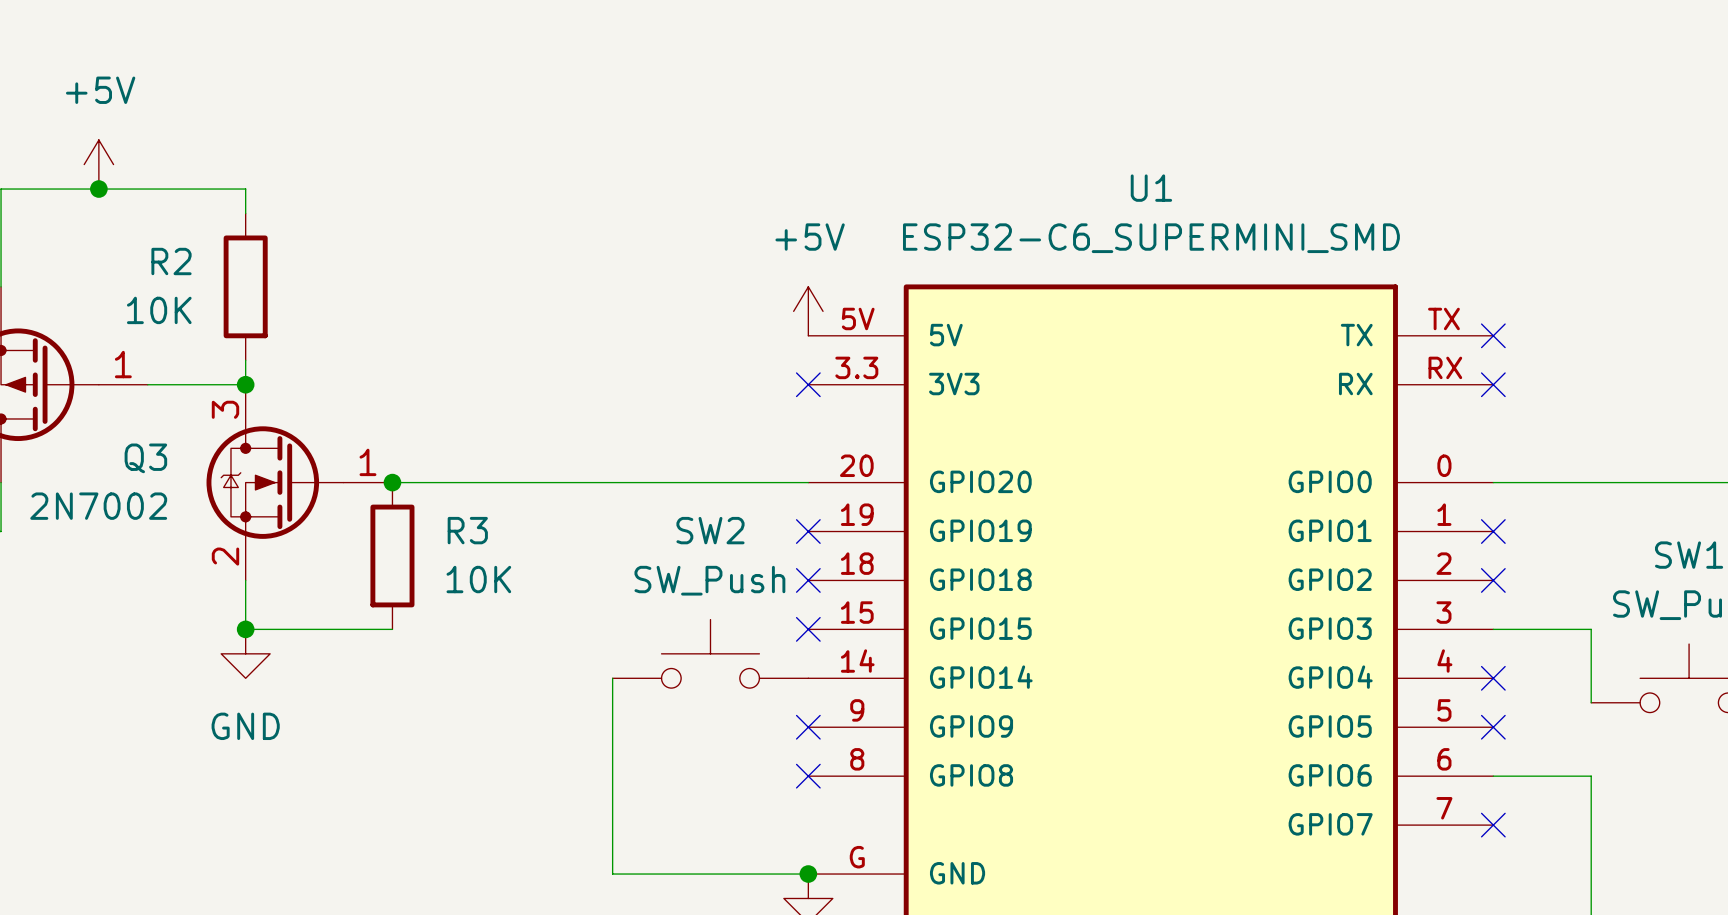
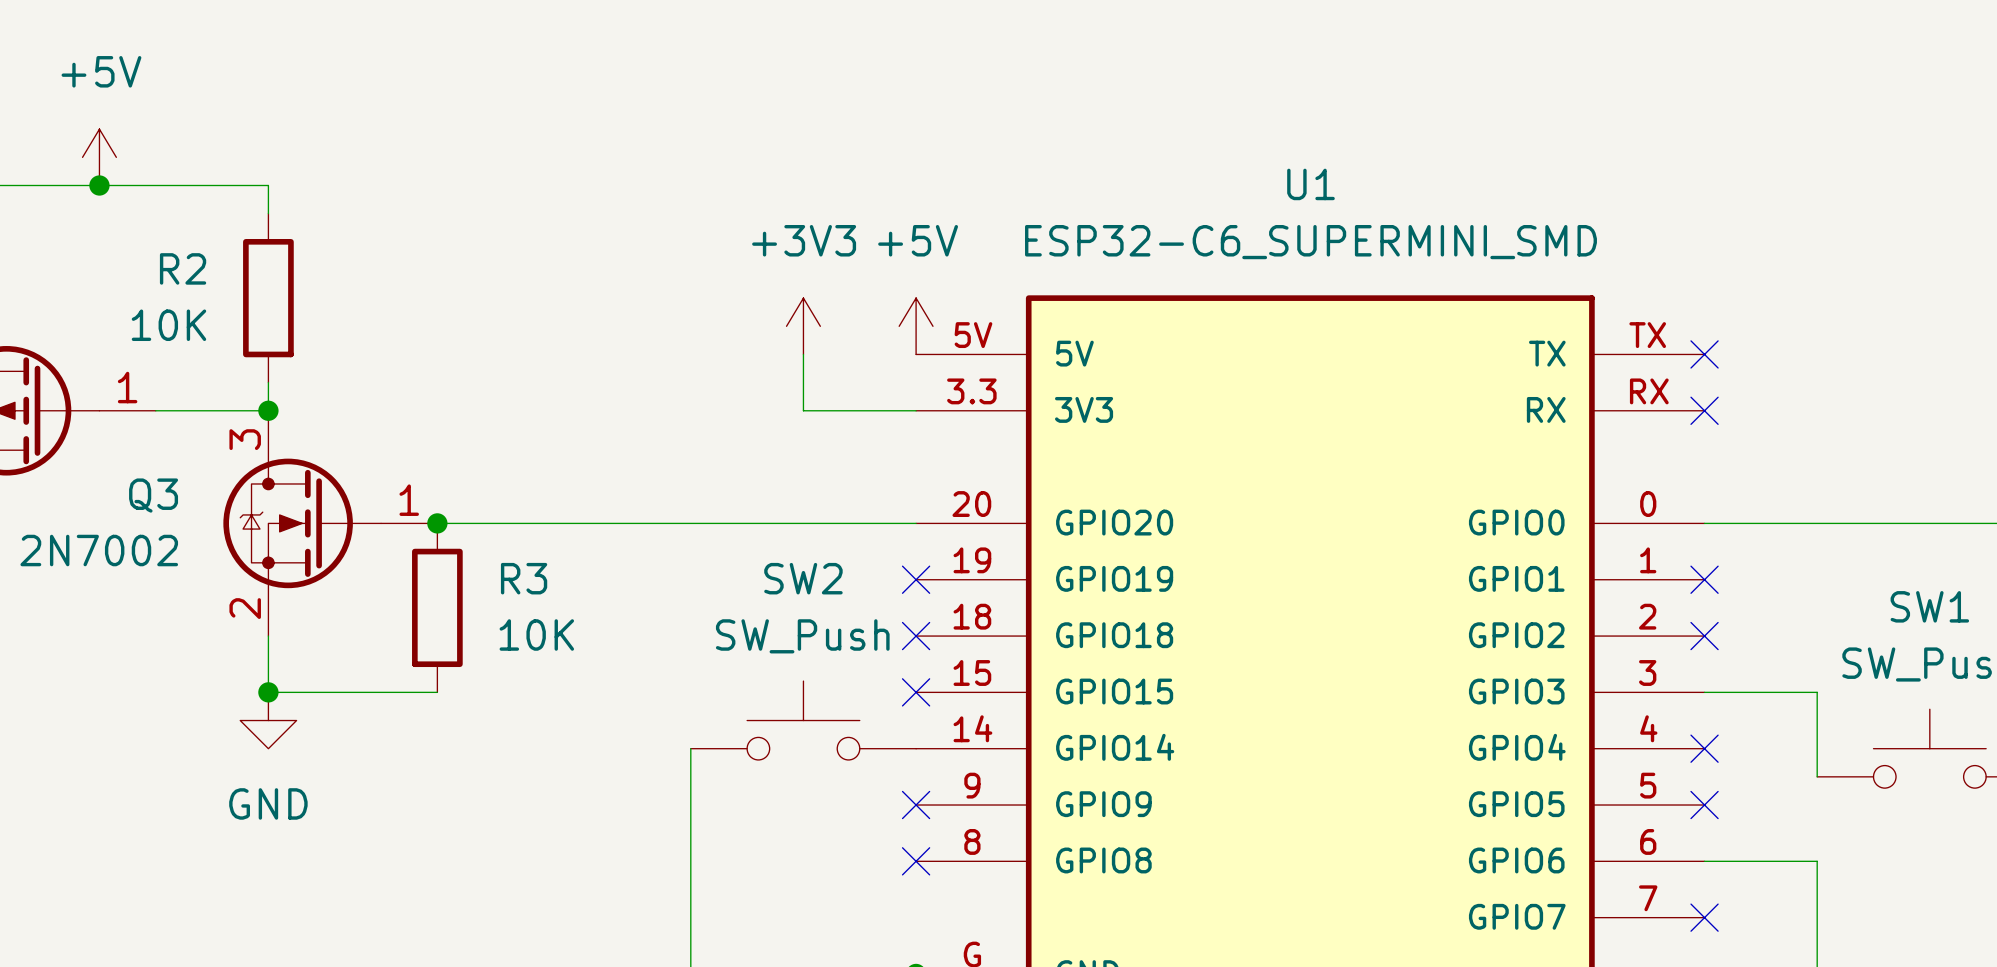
power symbol: none -> +3V3 (803, 326)
wire: none -> (803, 354) (803, 410) (916, 410)
no-connect mark: (808, 384) -> none

